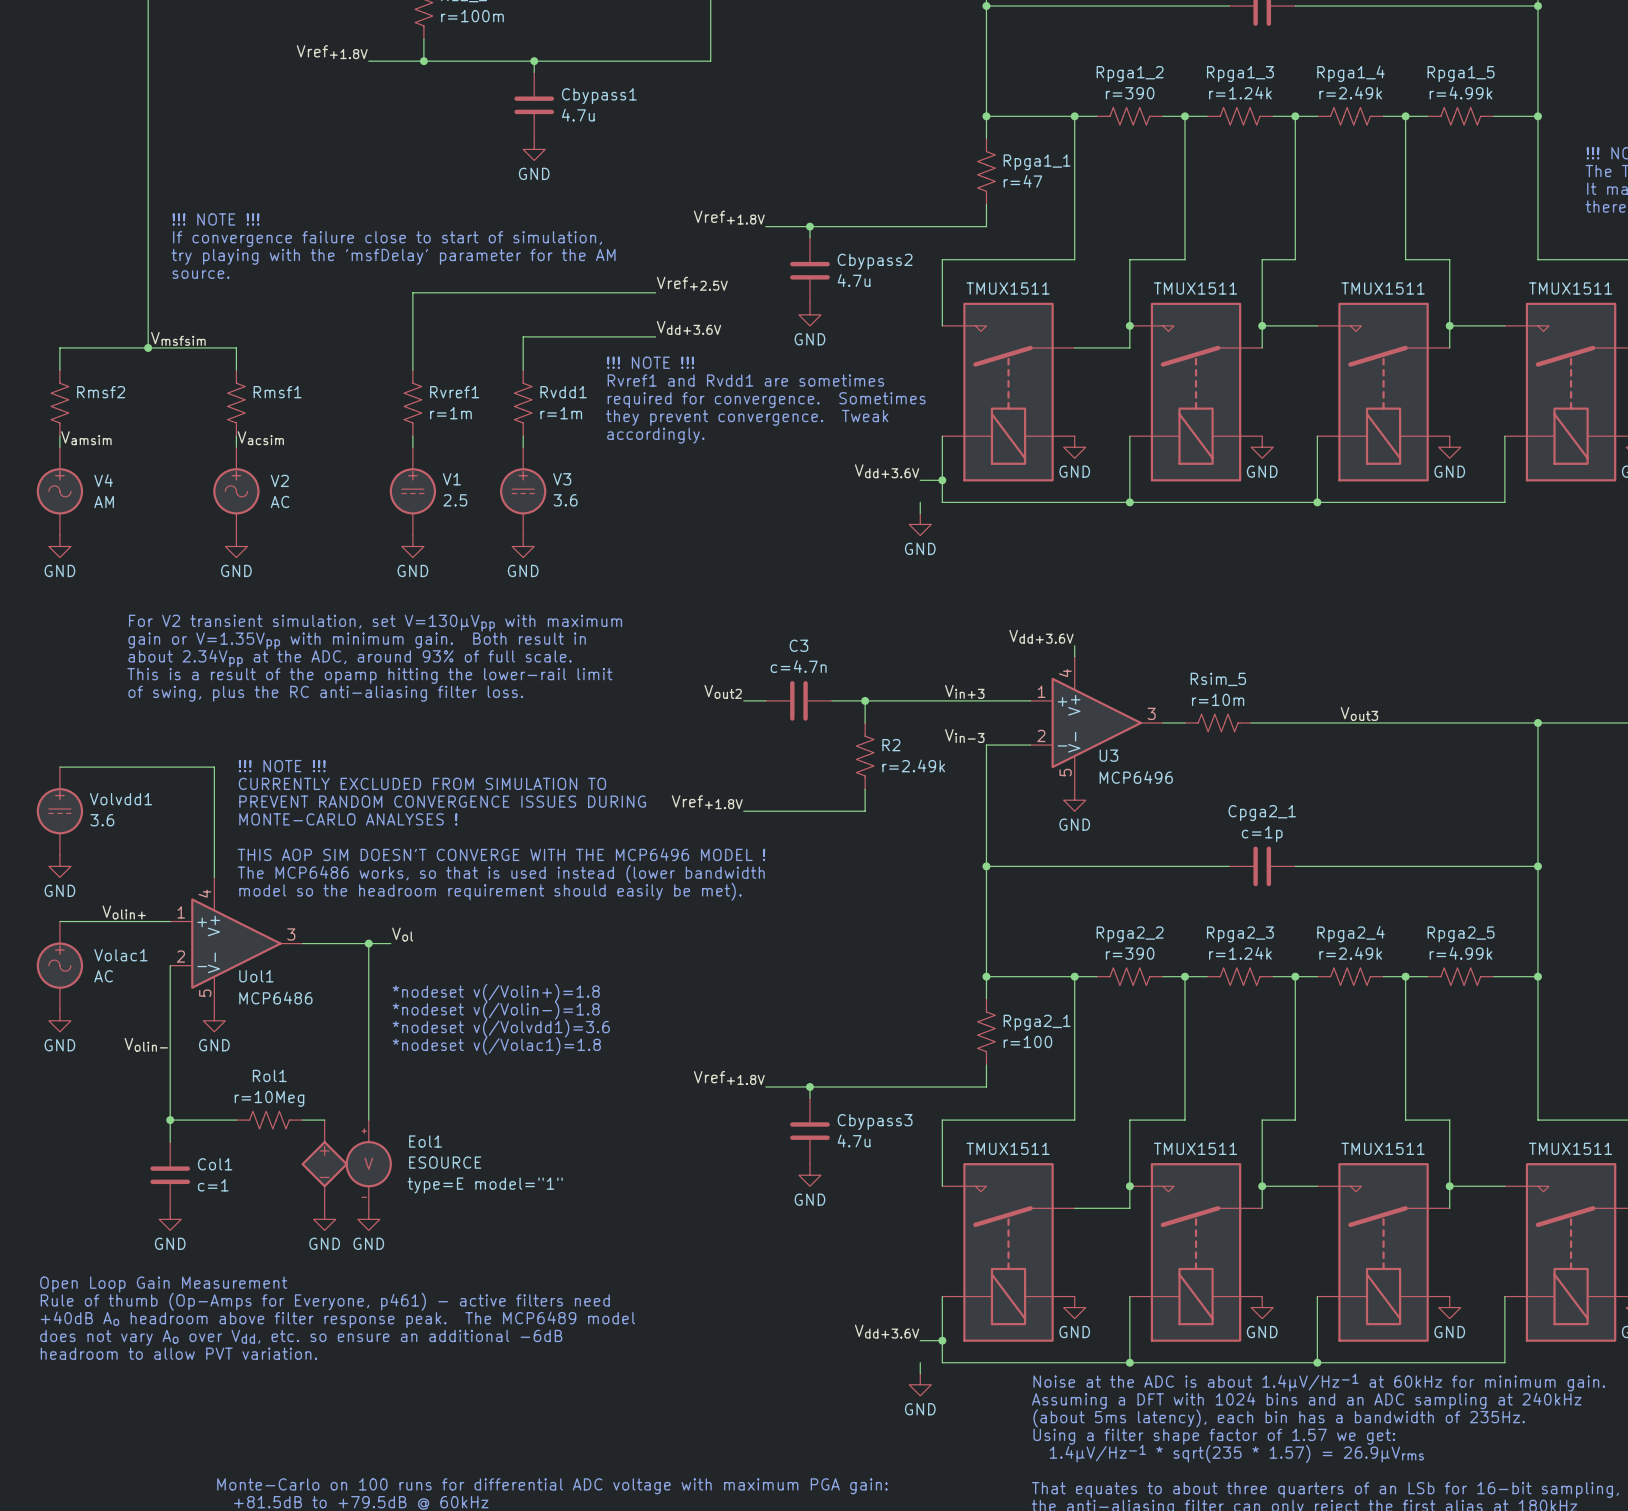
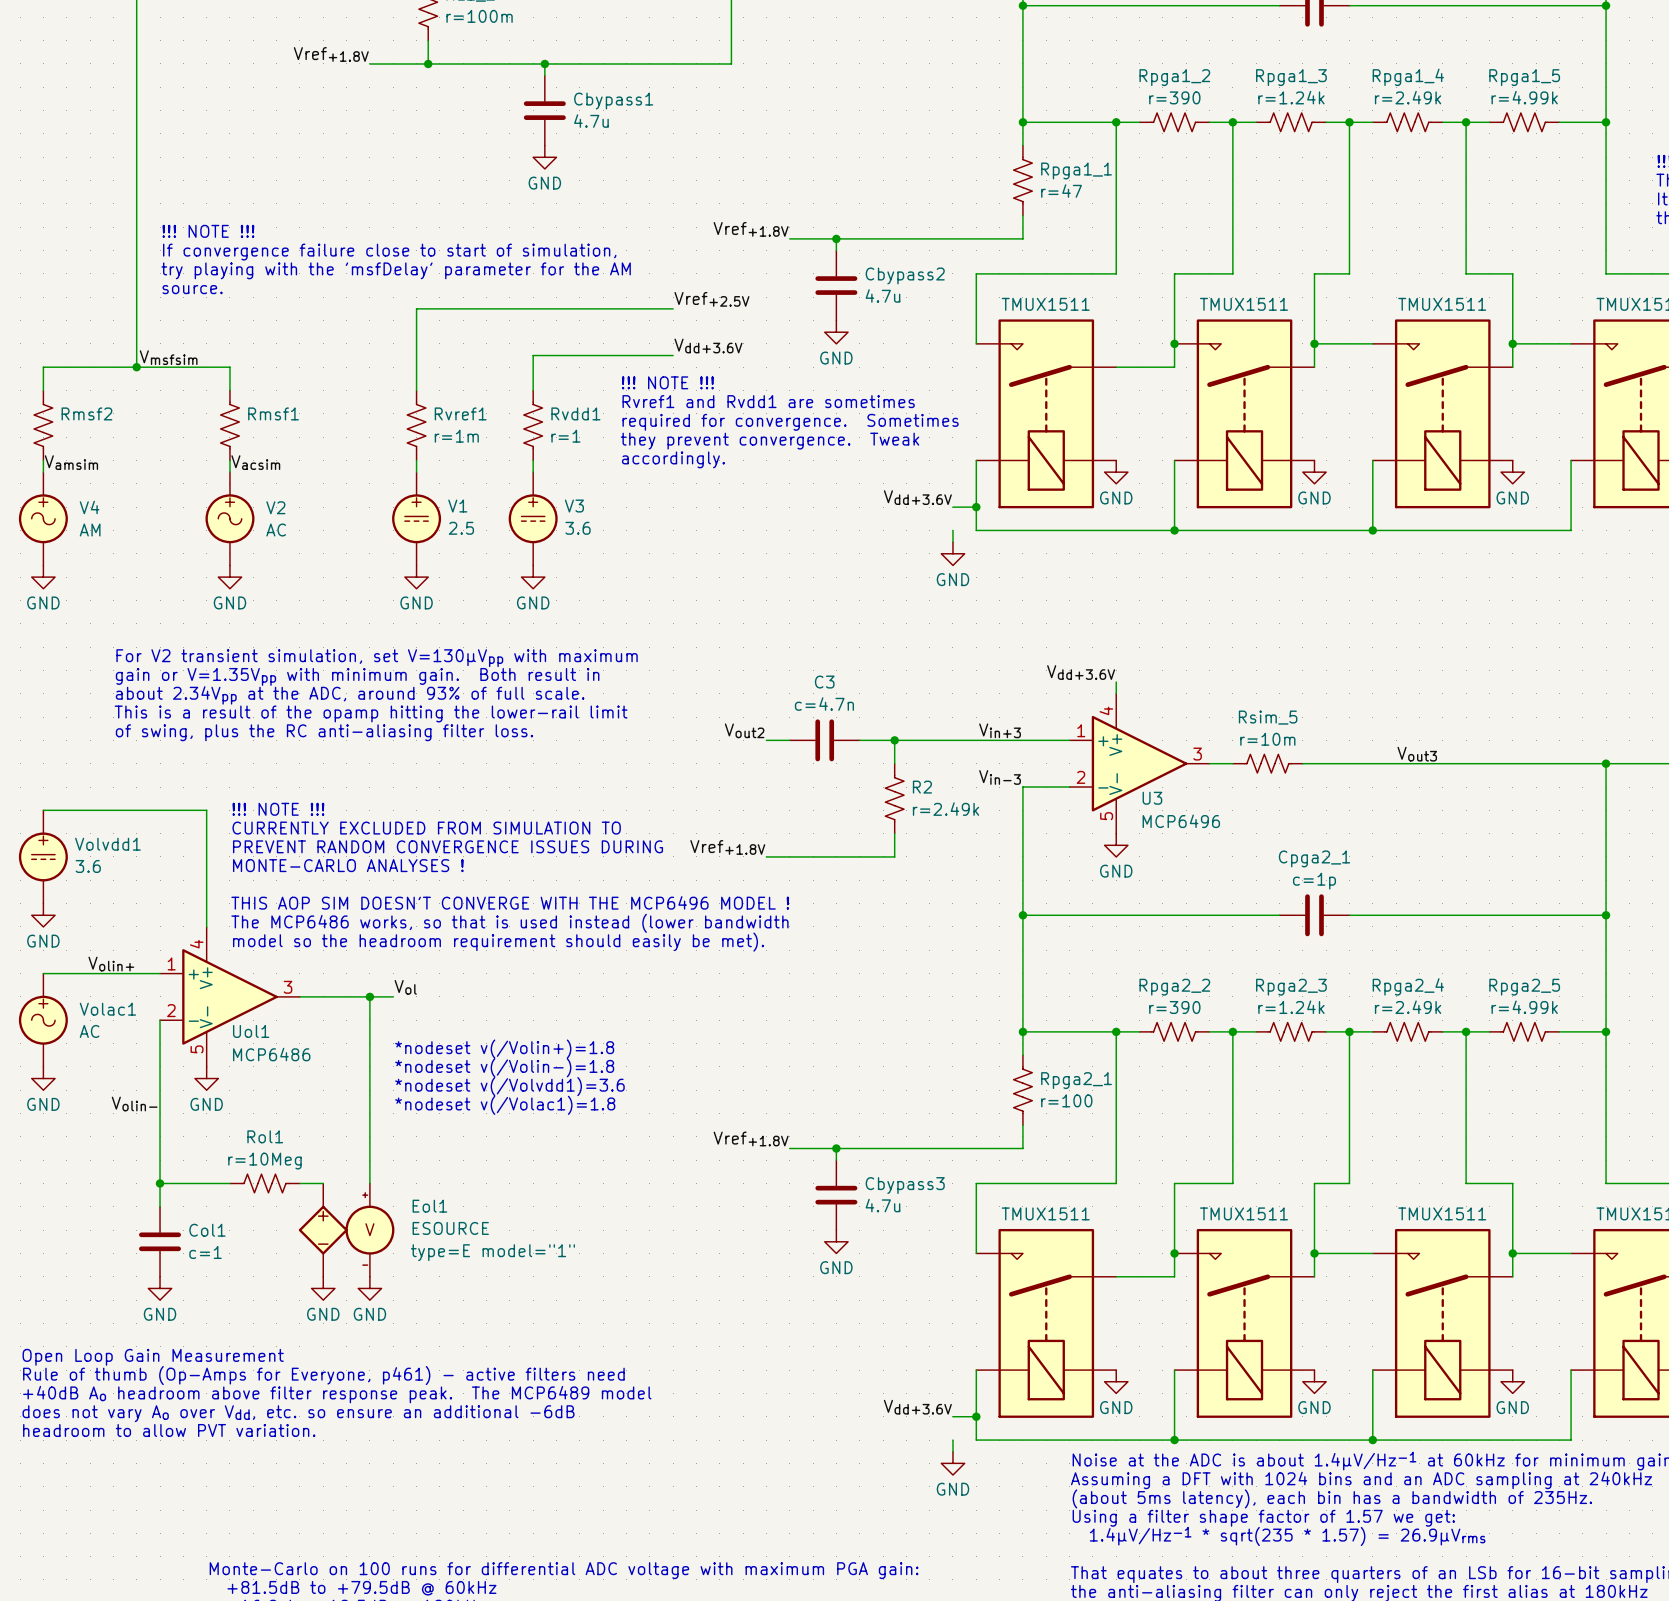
Rvdd1 value: r=1m (561, 413) -> r=1 (565, 436)

